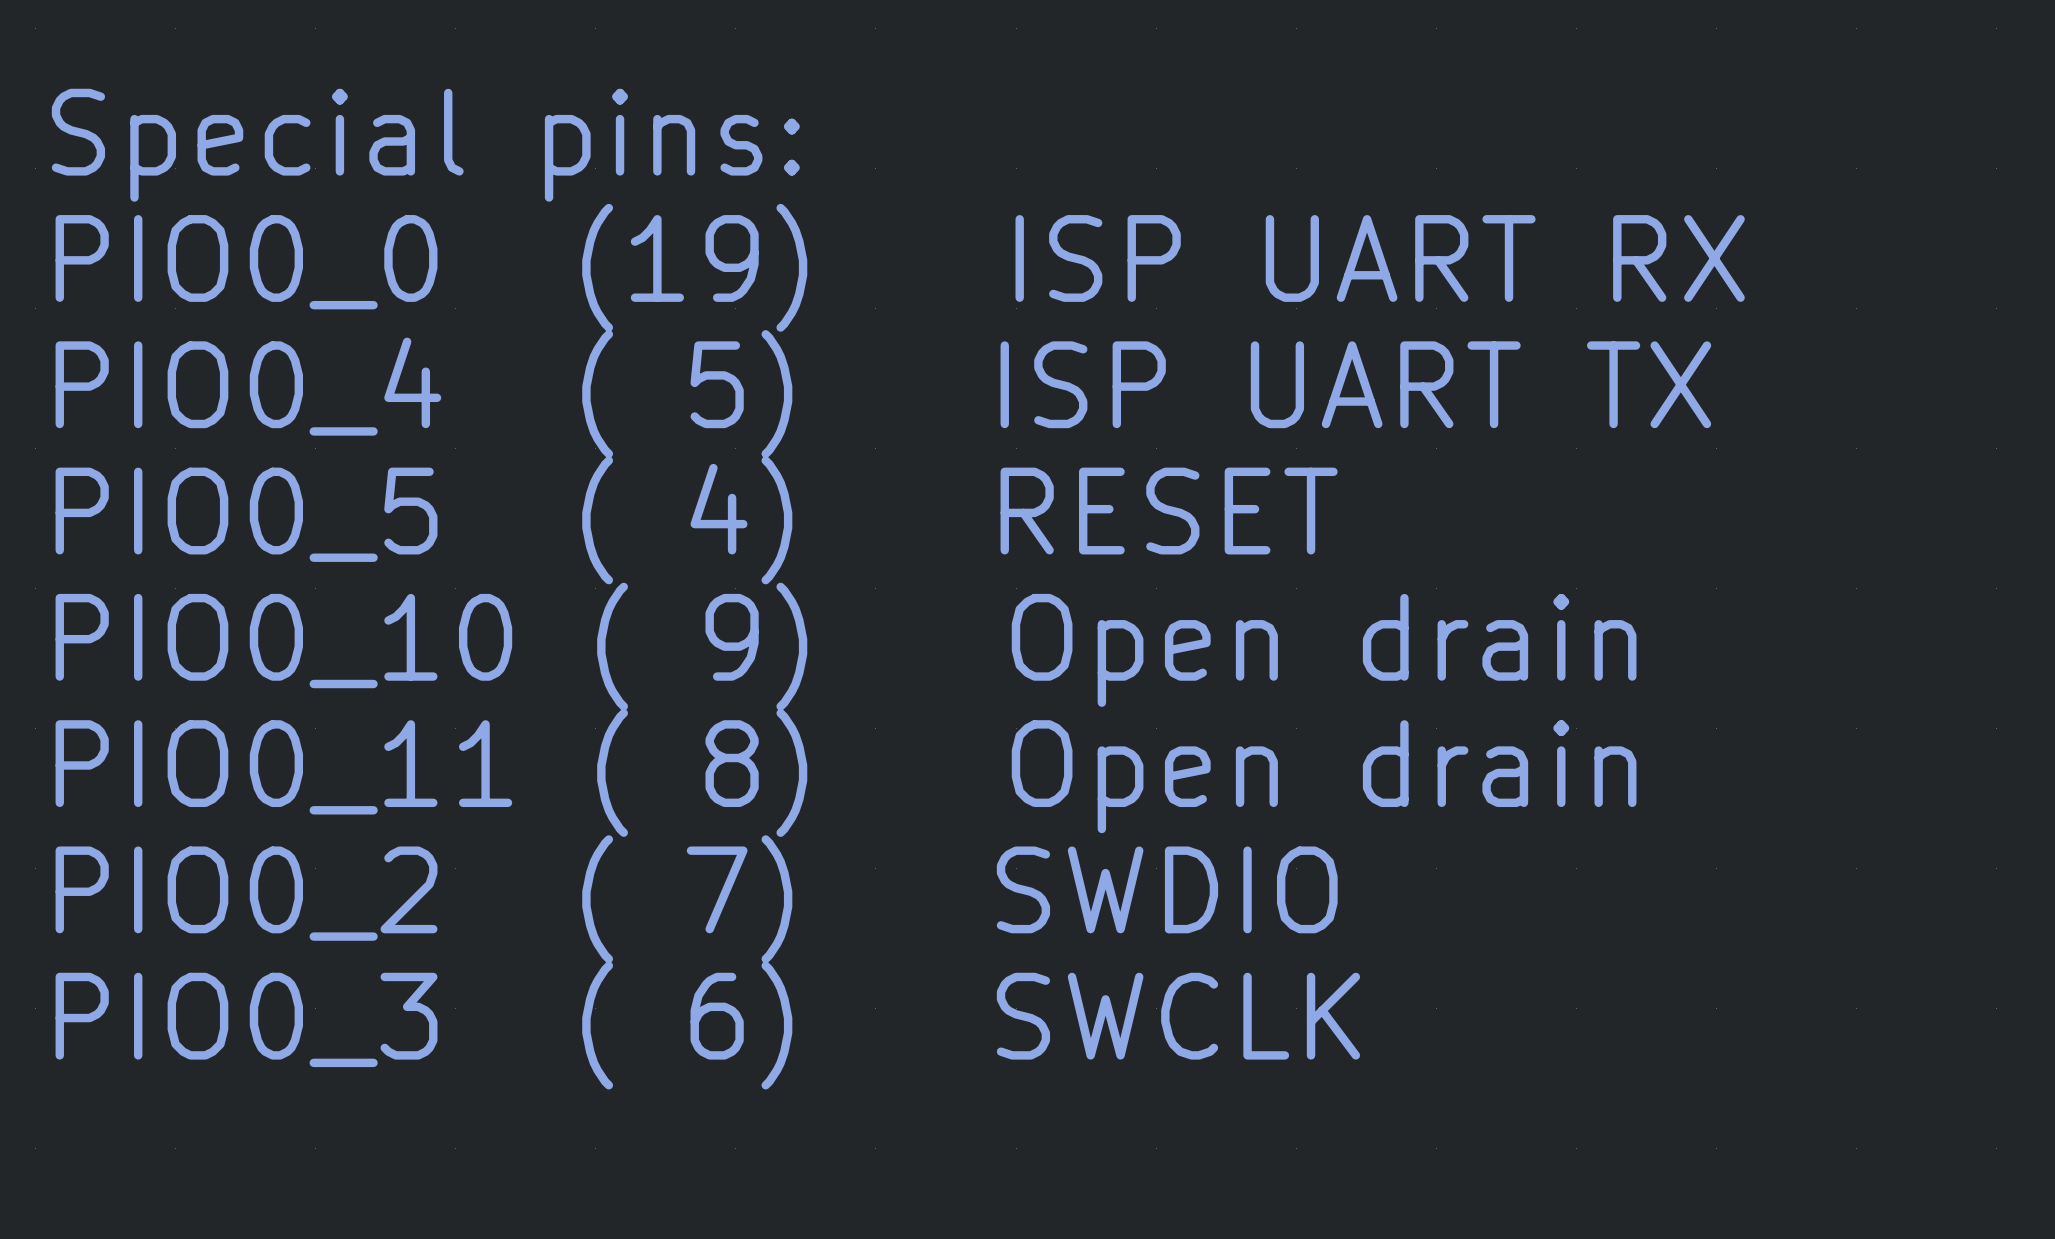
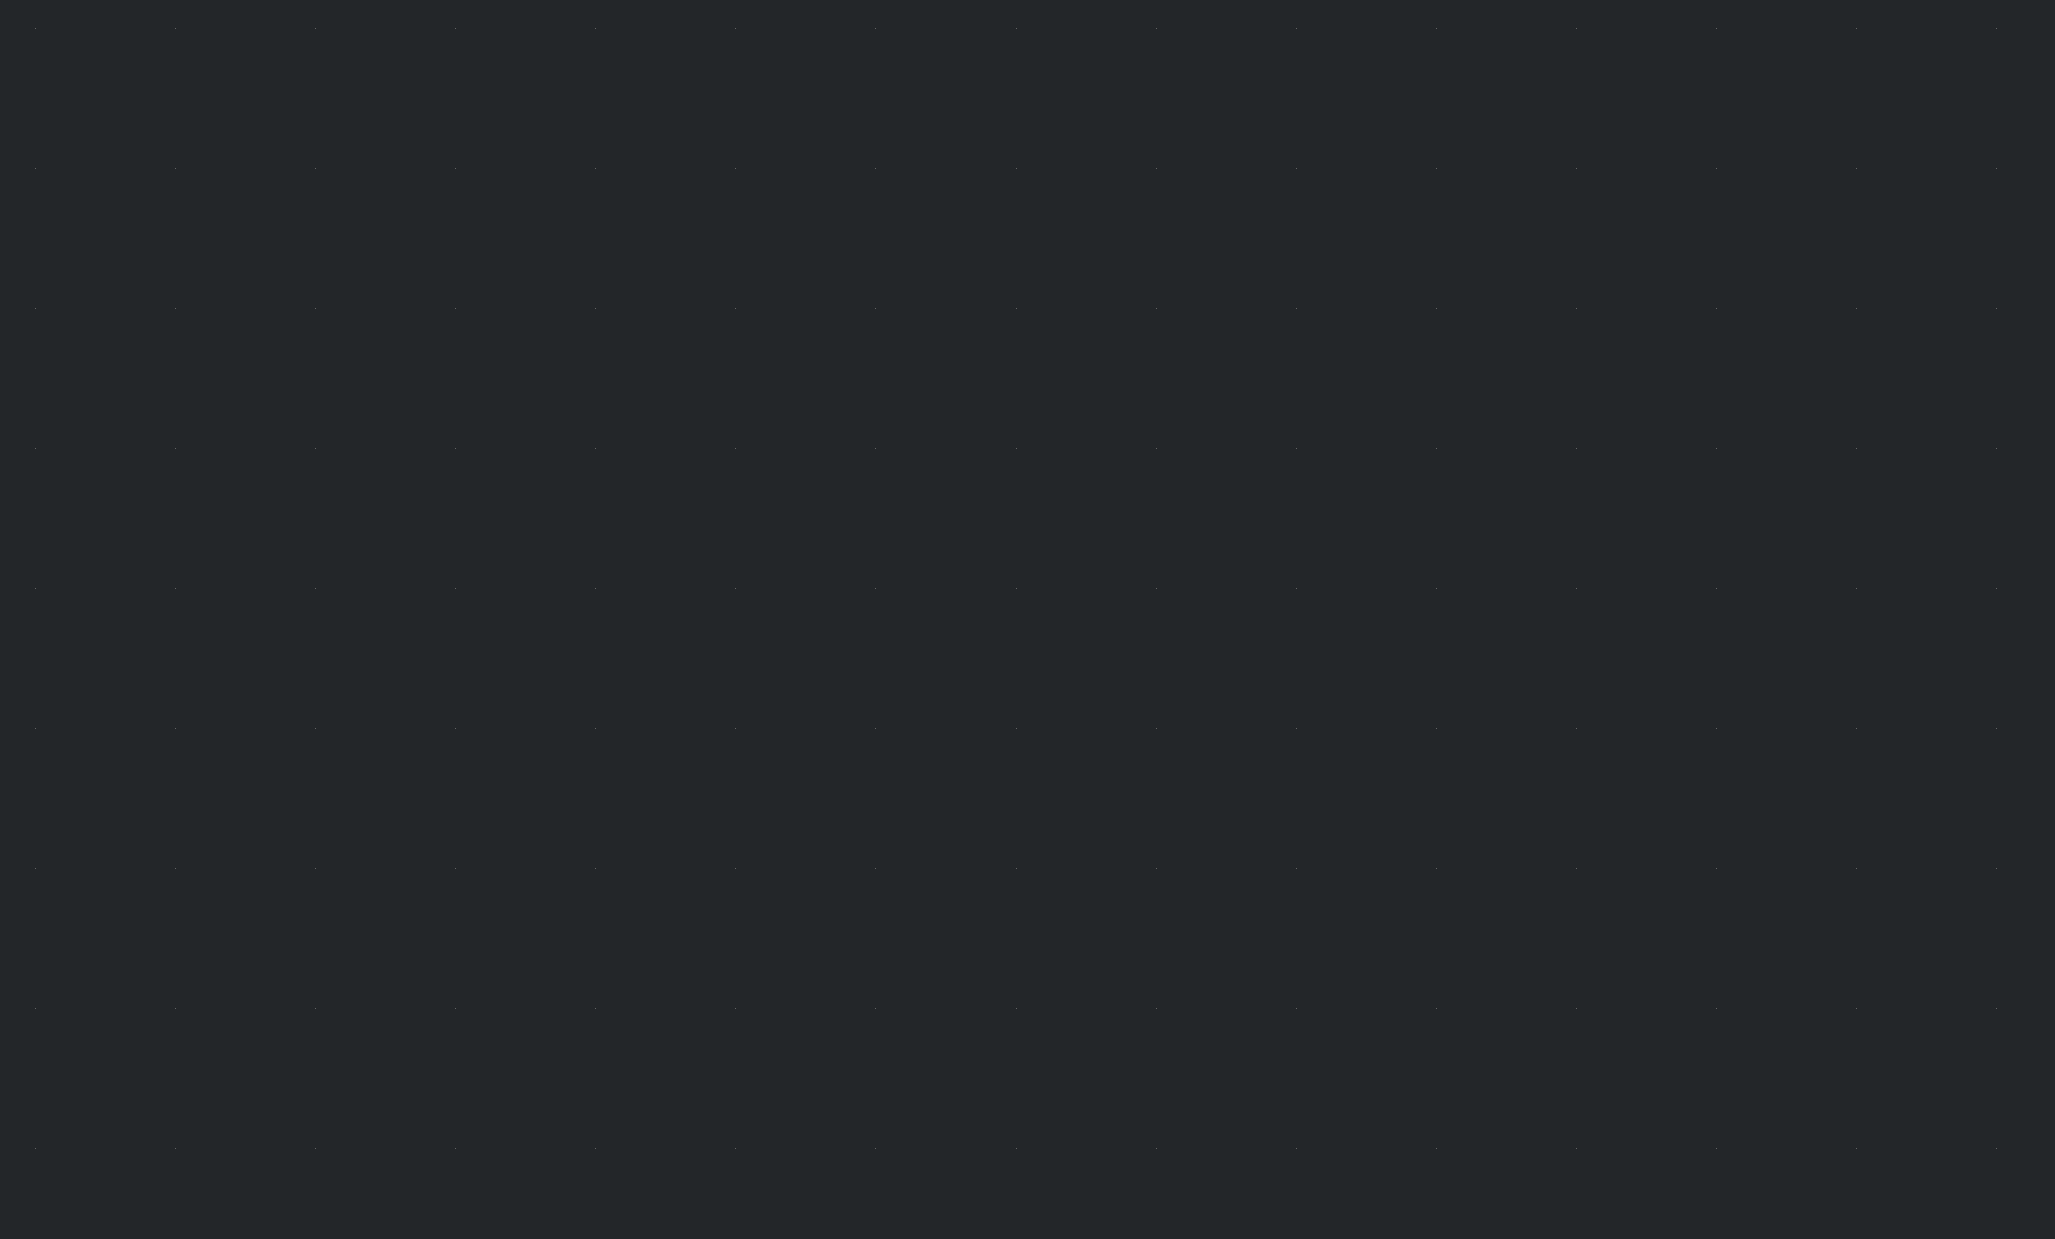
text: Special pins: (425, 145) -> none
text: PIO0_0 (19) ISP UART RX (900, 267) -> none
text: PIO0_4 ( 5) ISP UART TX (883, 394) -> none
text: PIO0_5 ( 4) RESET (696, 520) -> none
text: PIO0_10 ( 9) Open drain (846, 646) -> none
text: PIO0_11 ( 8) Open drain (846, 772) -> none
text: PIO0_2 ( 7) SWDIO (696, 899) -> none
text: PIO0_3 ( 6) SWCLK (707, 1025) -> none

